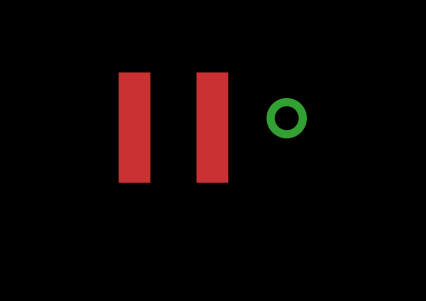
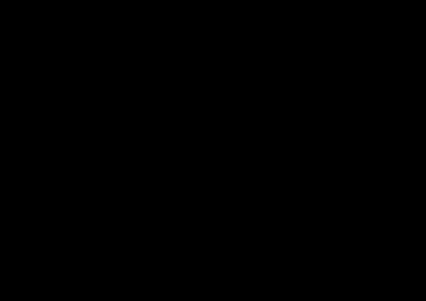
part: (286, 118) -> none
part: (173, 127) -> none

